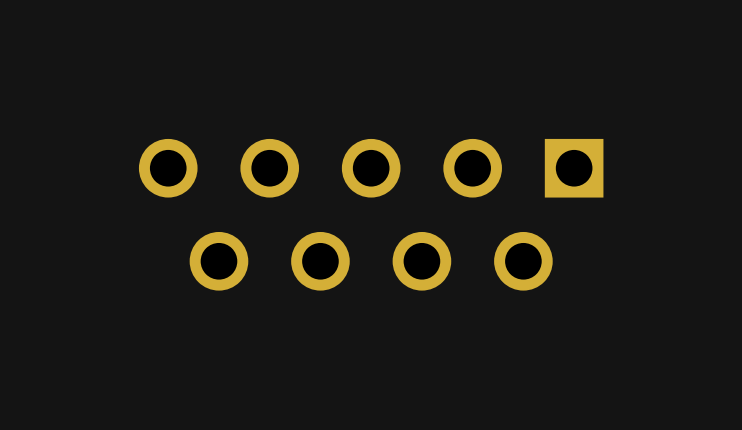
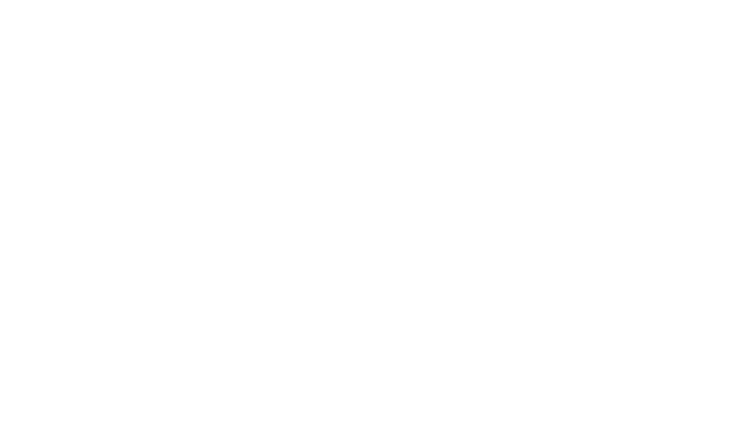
part: (371, 214) -> none

